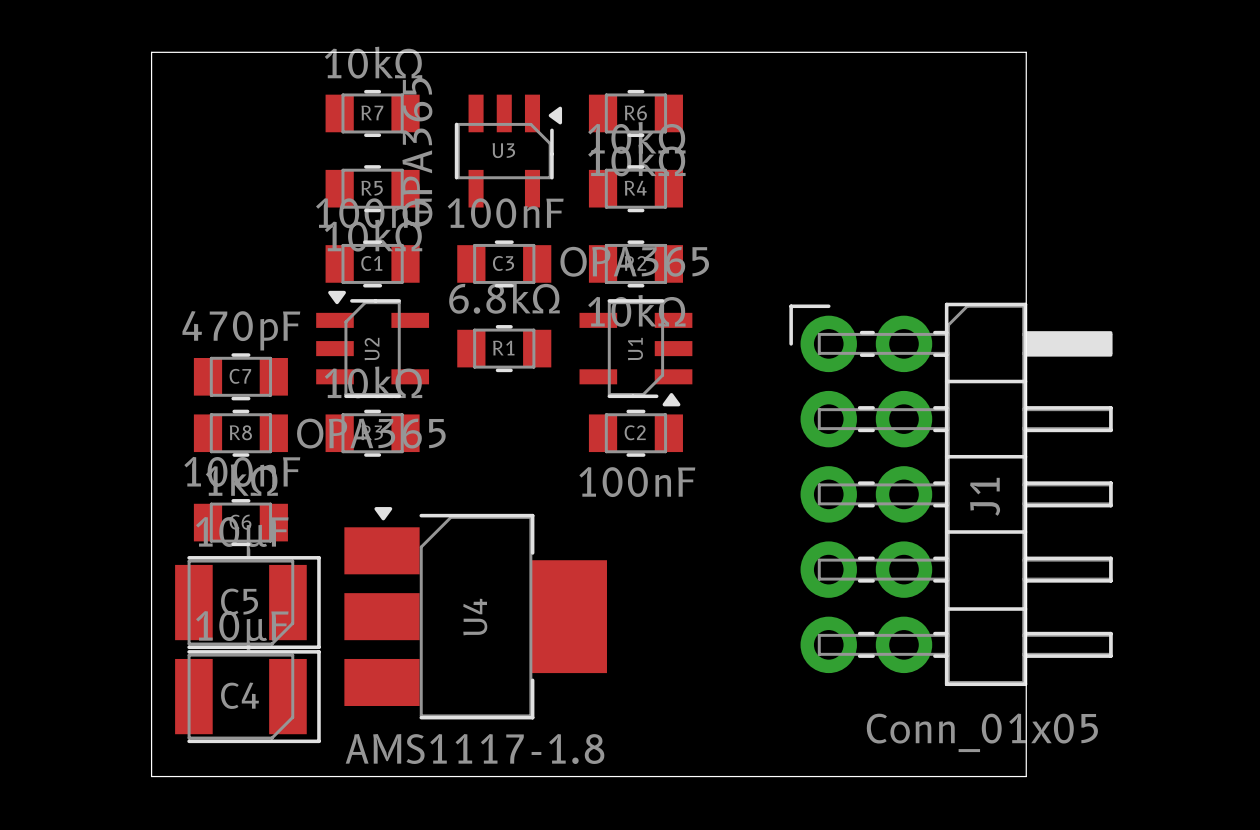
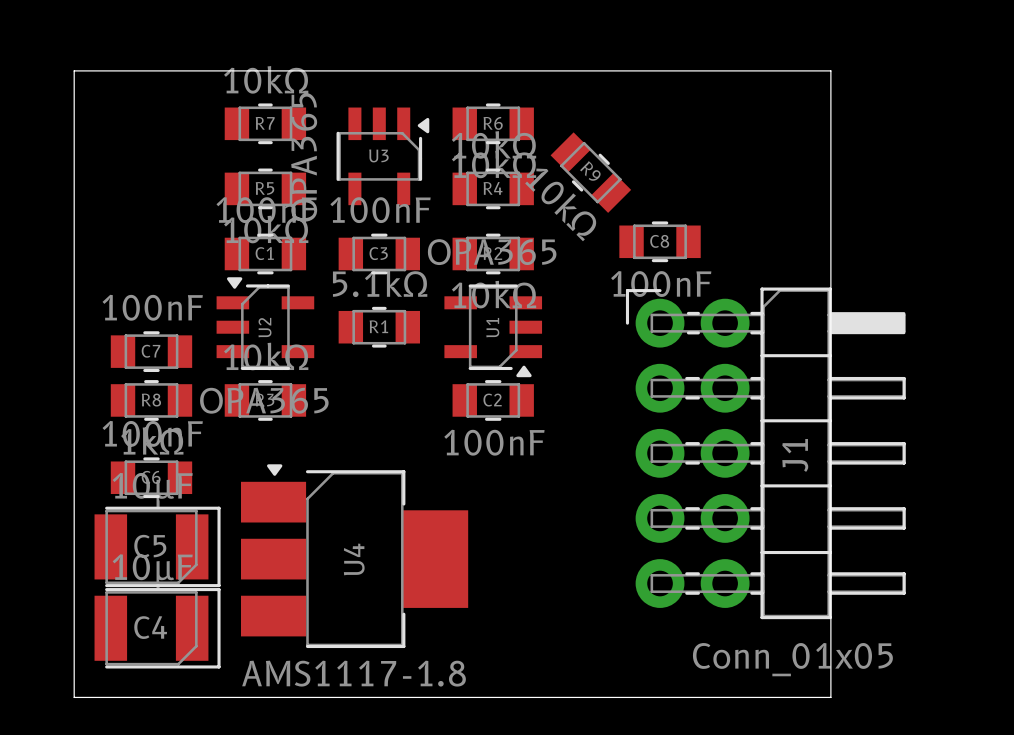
R9: none -> 10kΩ (590, 172)
C8: none -> 100nF (660, 241)
R1 value: 6.8kΩ (504, 297) -> 5.1kΩ (380, 283)
C7 value: 470pF (241, 330) -> 100nF (152, 307)

